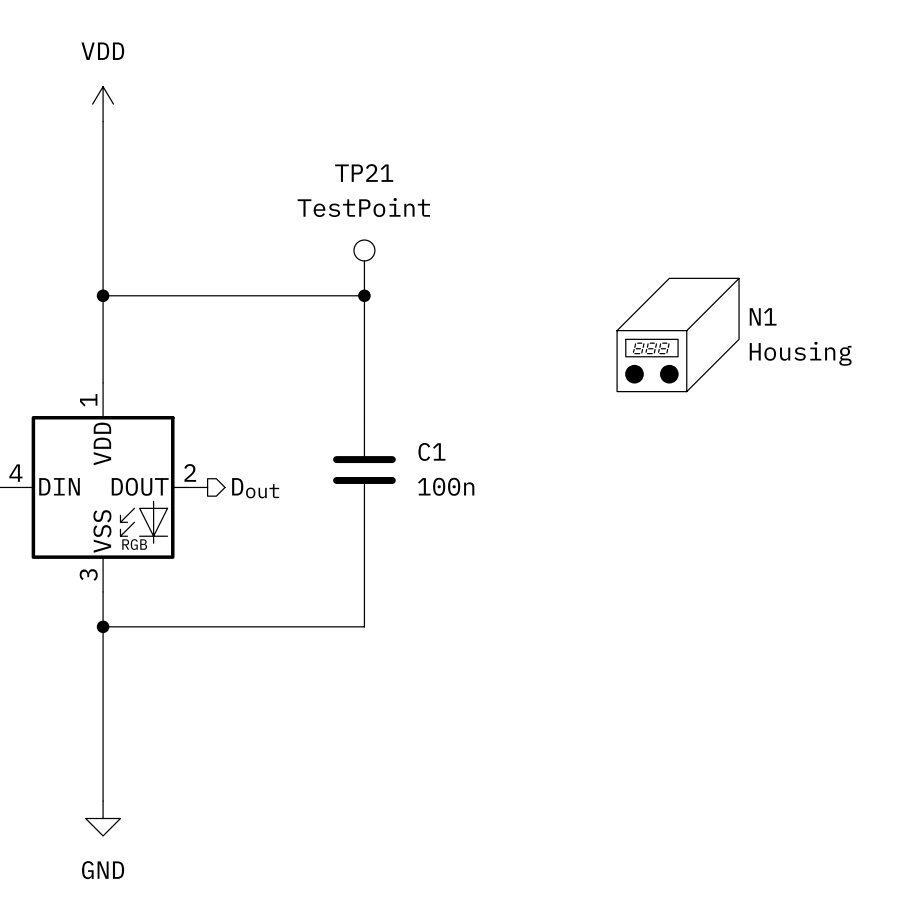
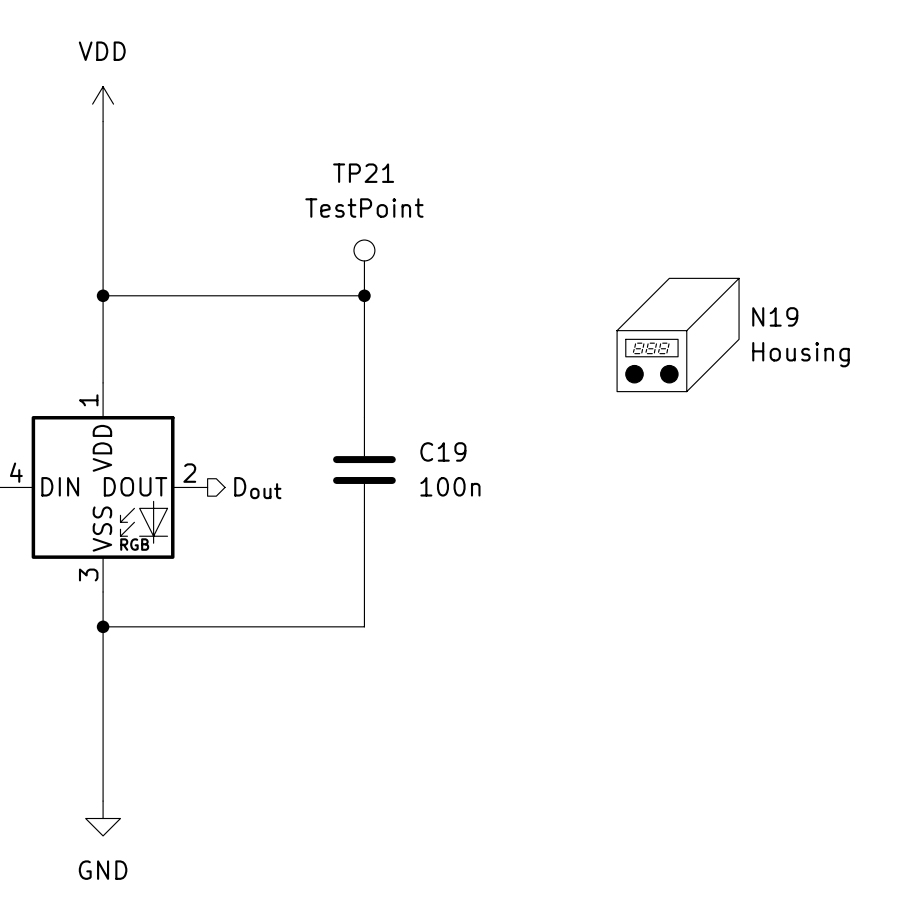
N1 name: N1 (763, 316) -> N19 (775, 316)
C1 name: C1 (431, 451) -> C19 (443, 451)

